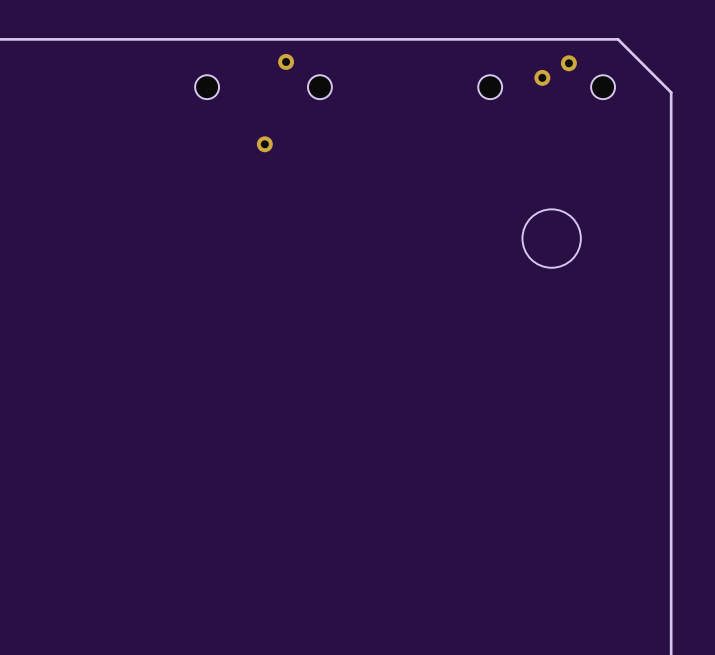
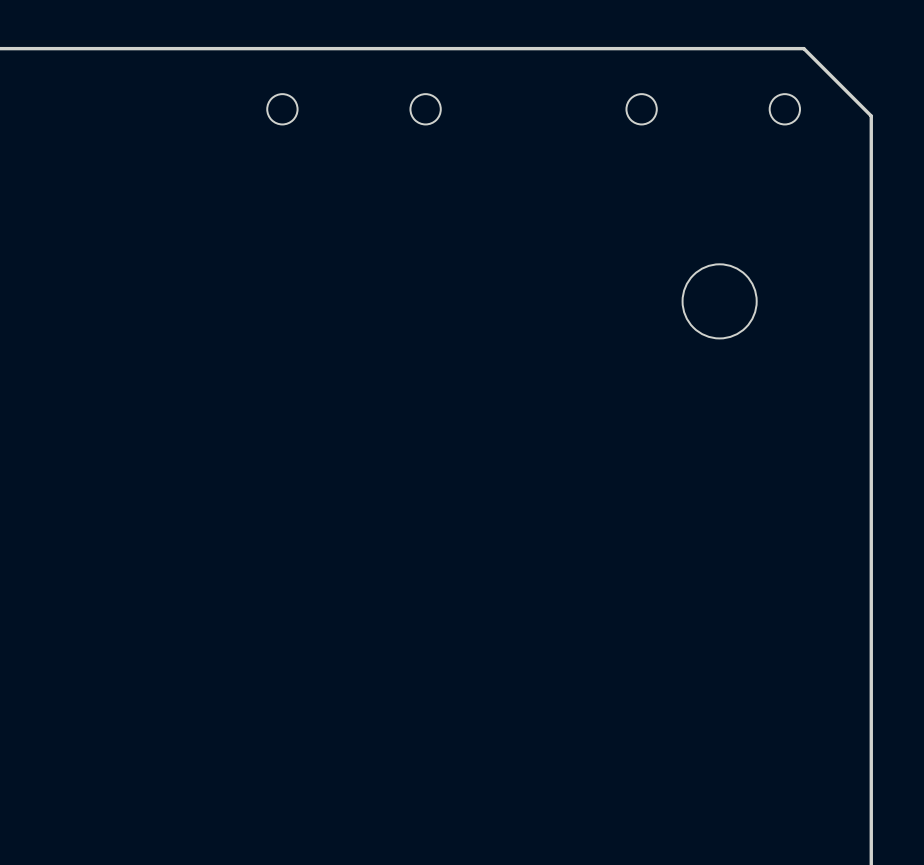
via: (286, 61) -> none
via: (568, 63) -> none
via: (542, 77) -> none
via: (264, 144) -> none

